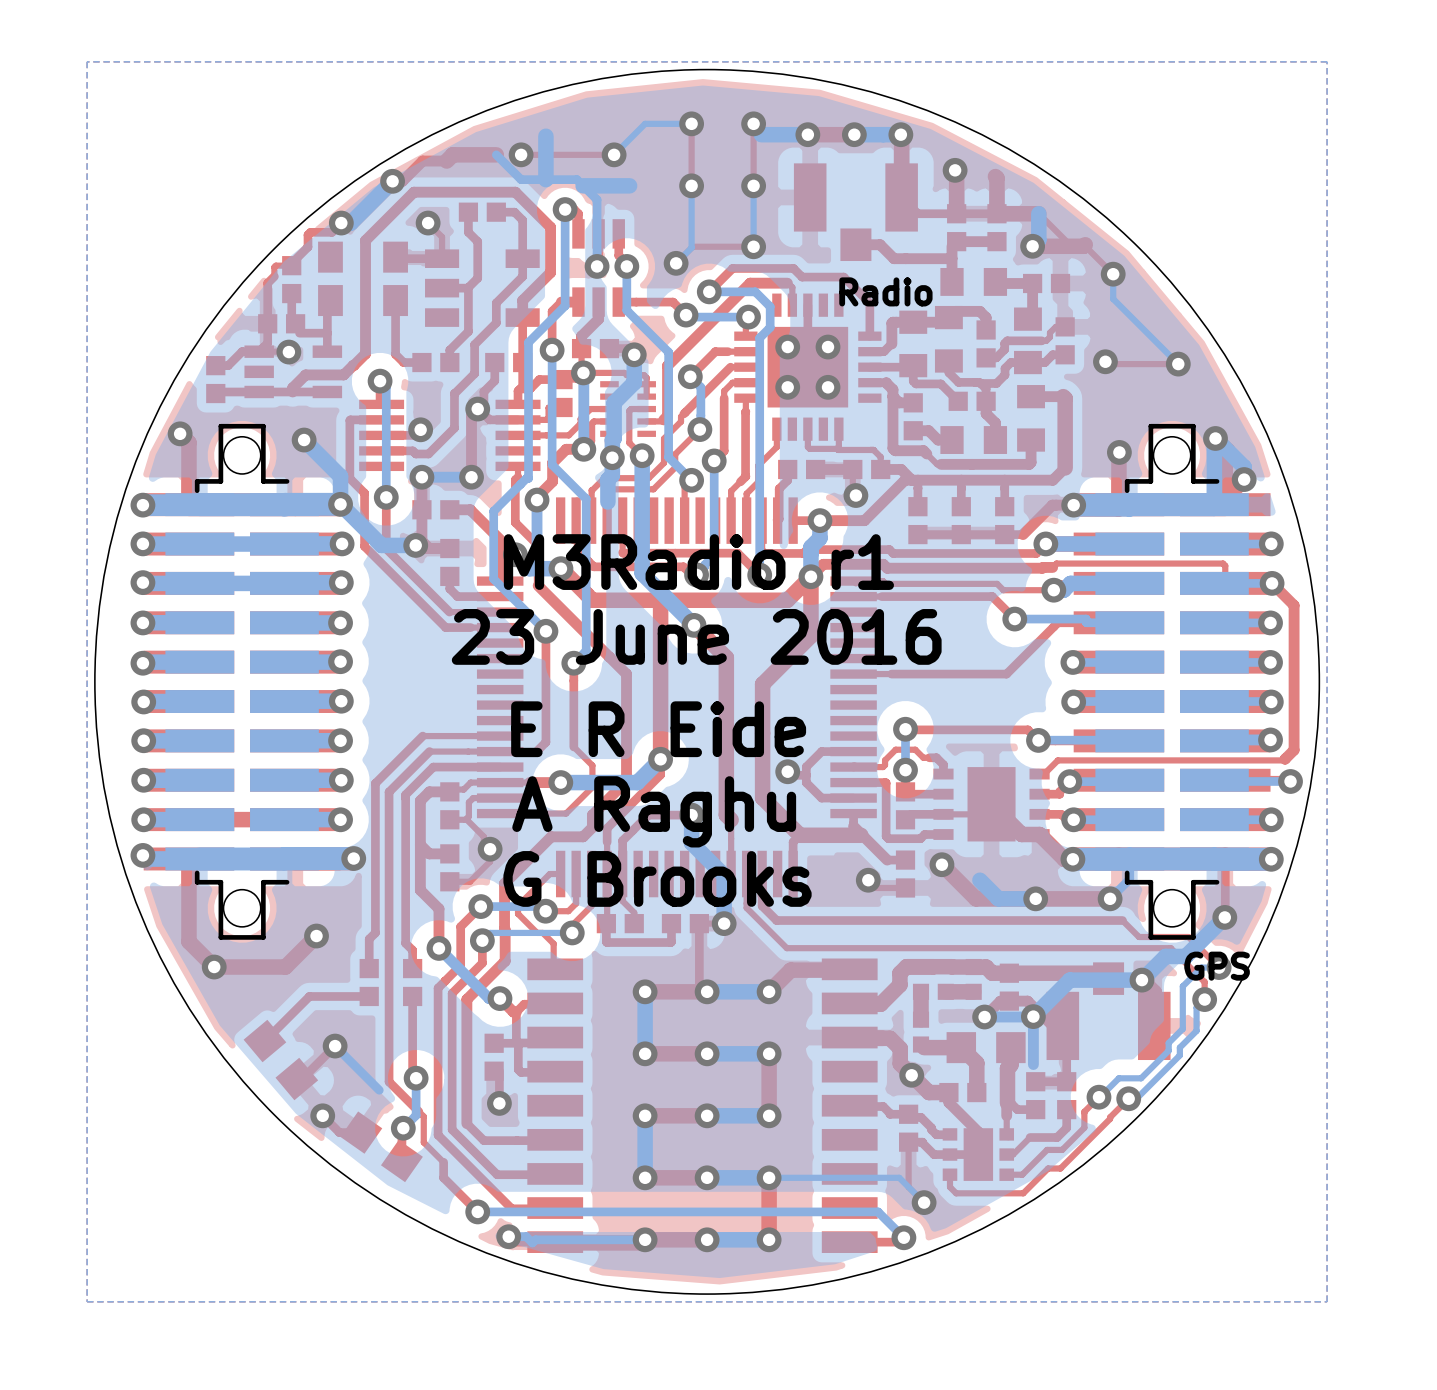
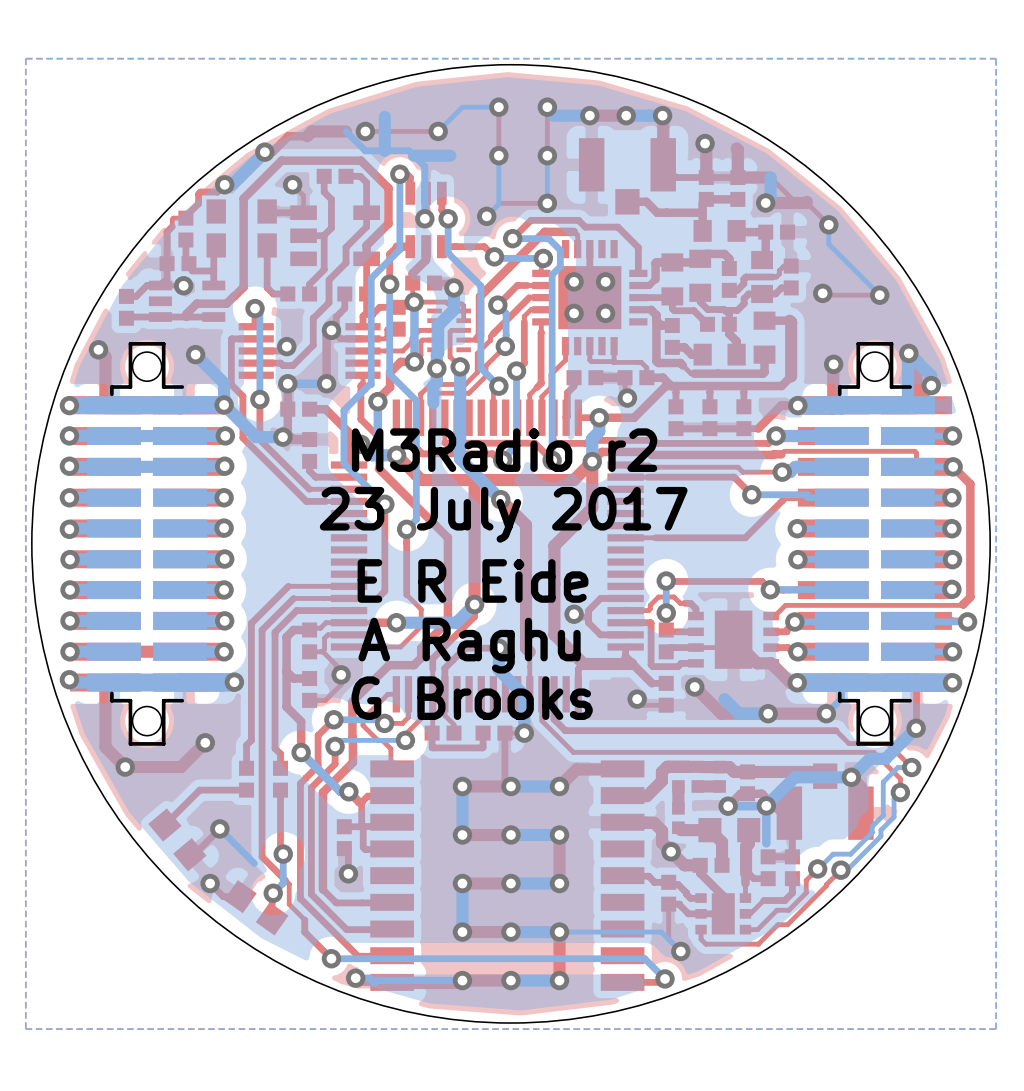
text: Radio (885, 291) -> none
text: M3Radio r1 (698, 562) -> M3Radio r2 (504, 450)
text: 23 June 2016 (696, 636) -> 23 July 2017 (503, 514)
text: GPS (1217, 966) -> none

